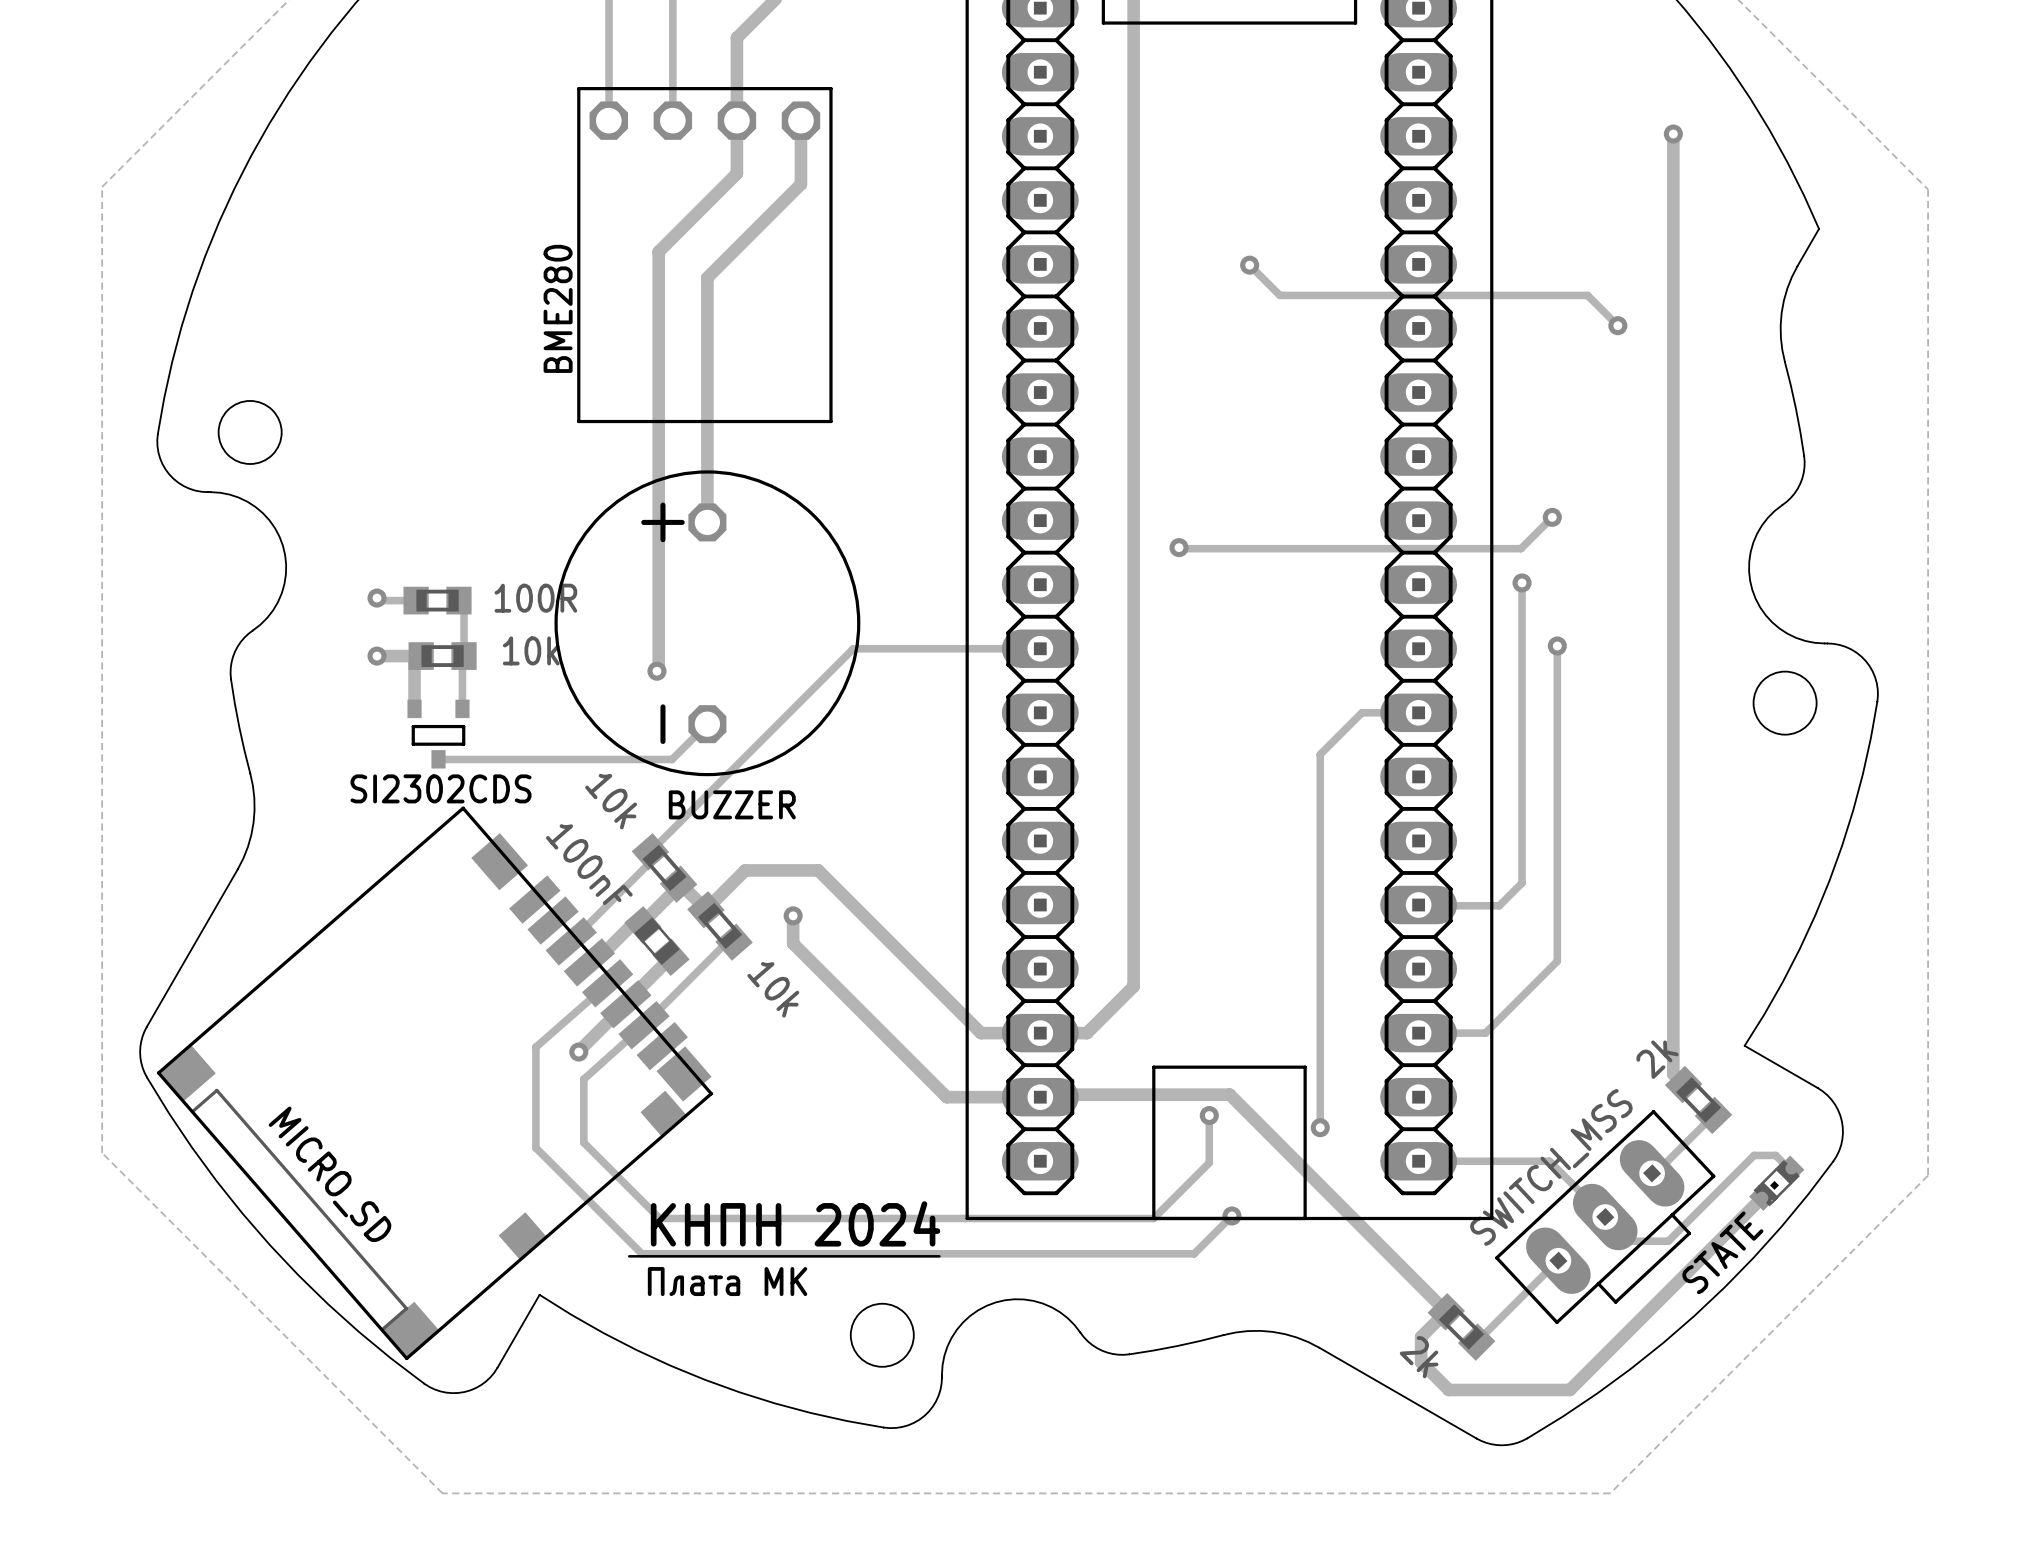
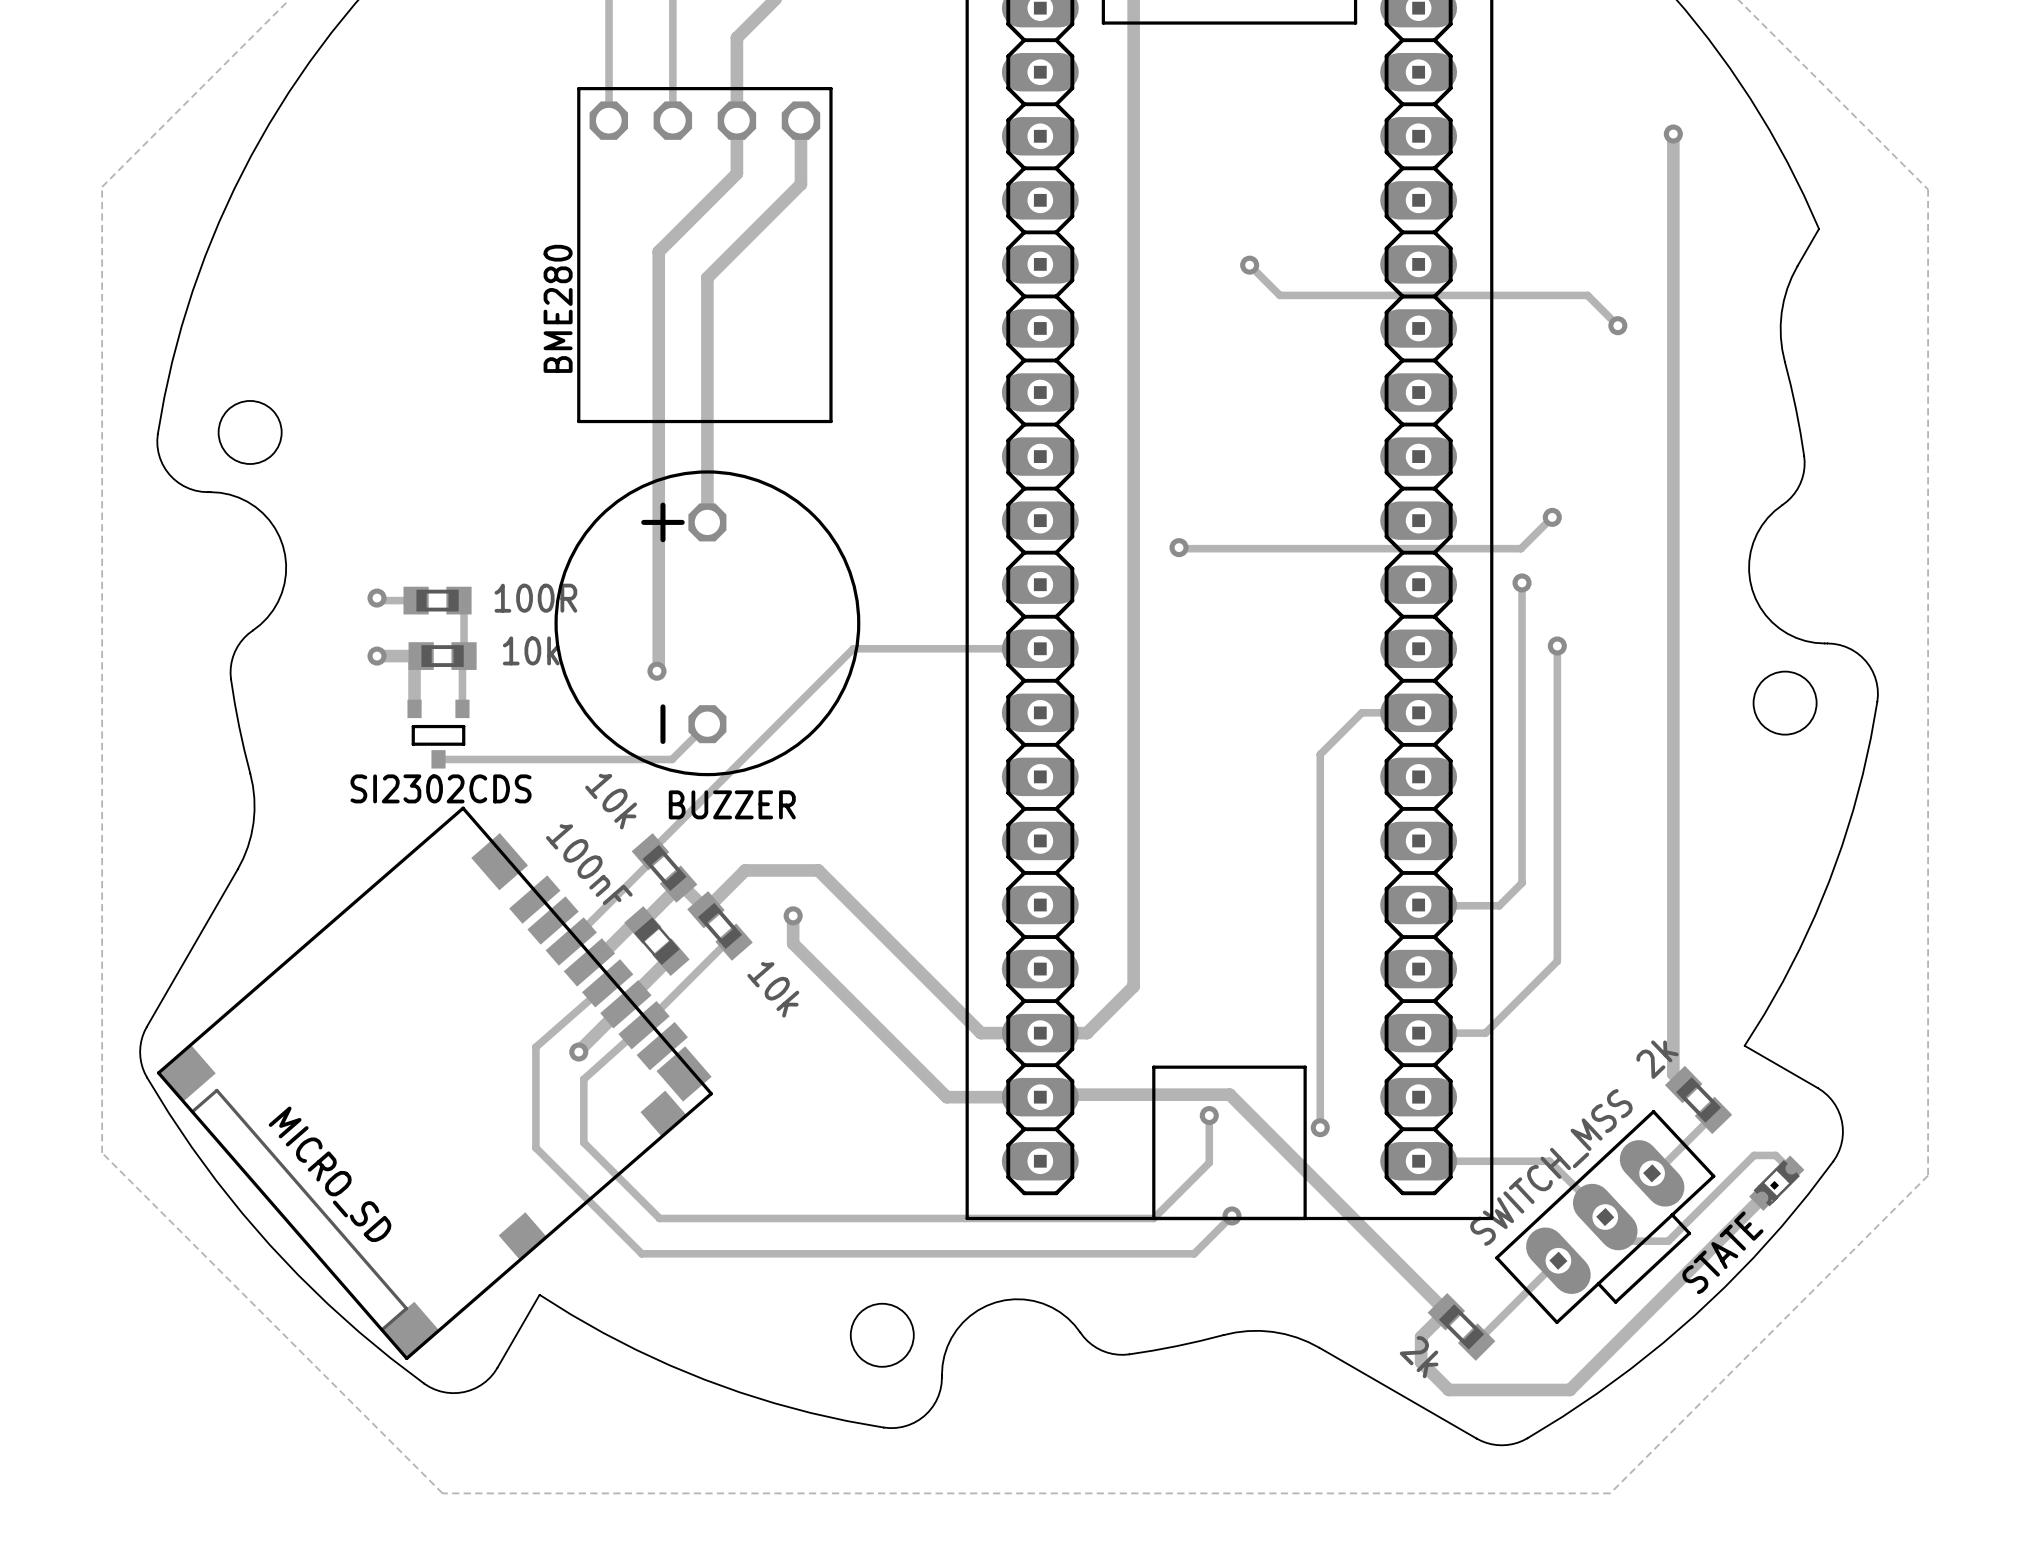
drawing: [627, 1255, 941, 1258] -> none

